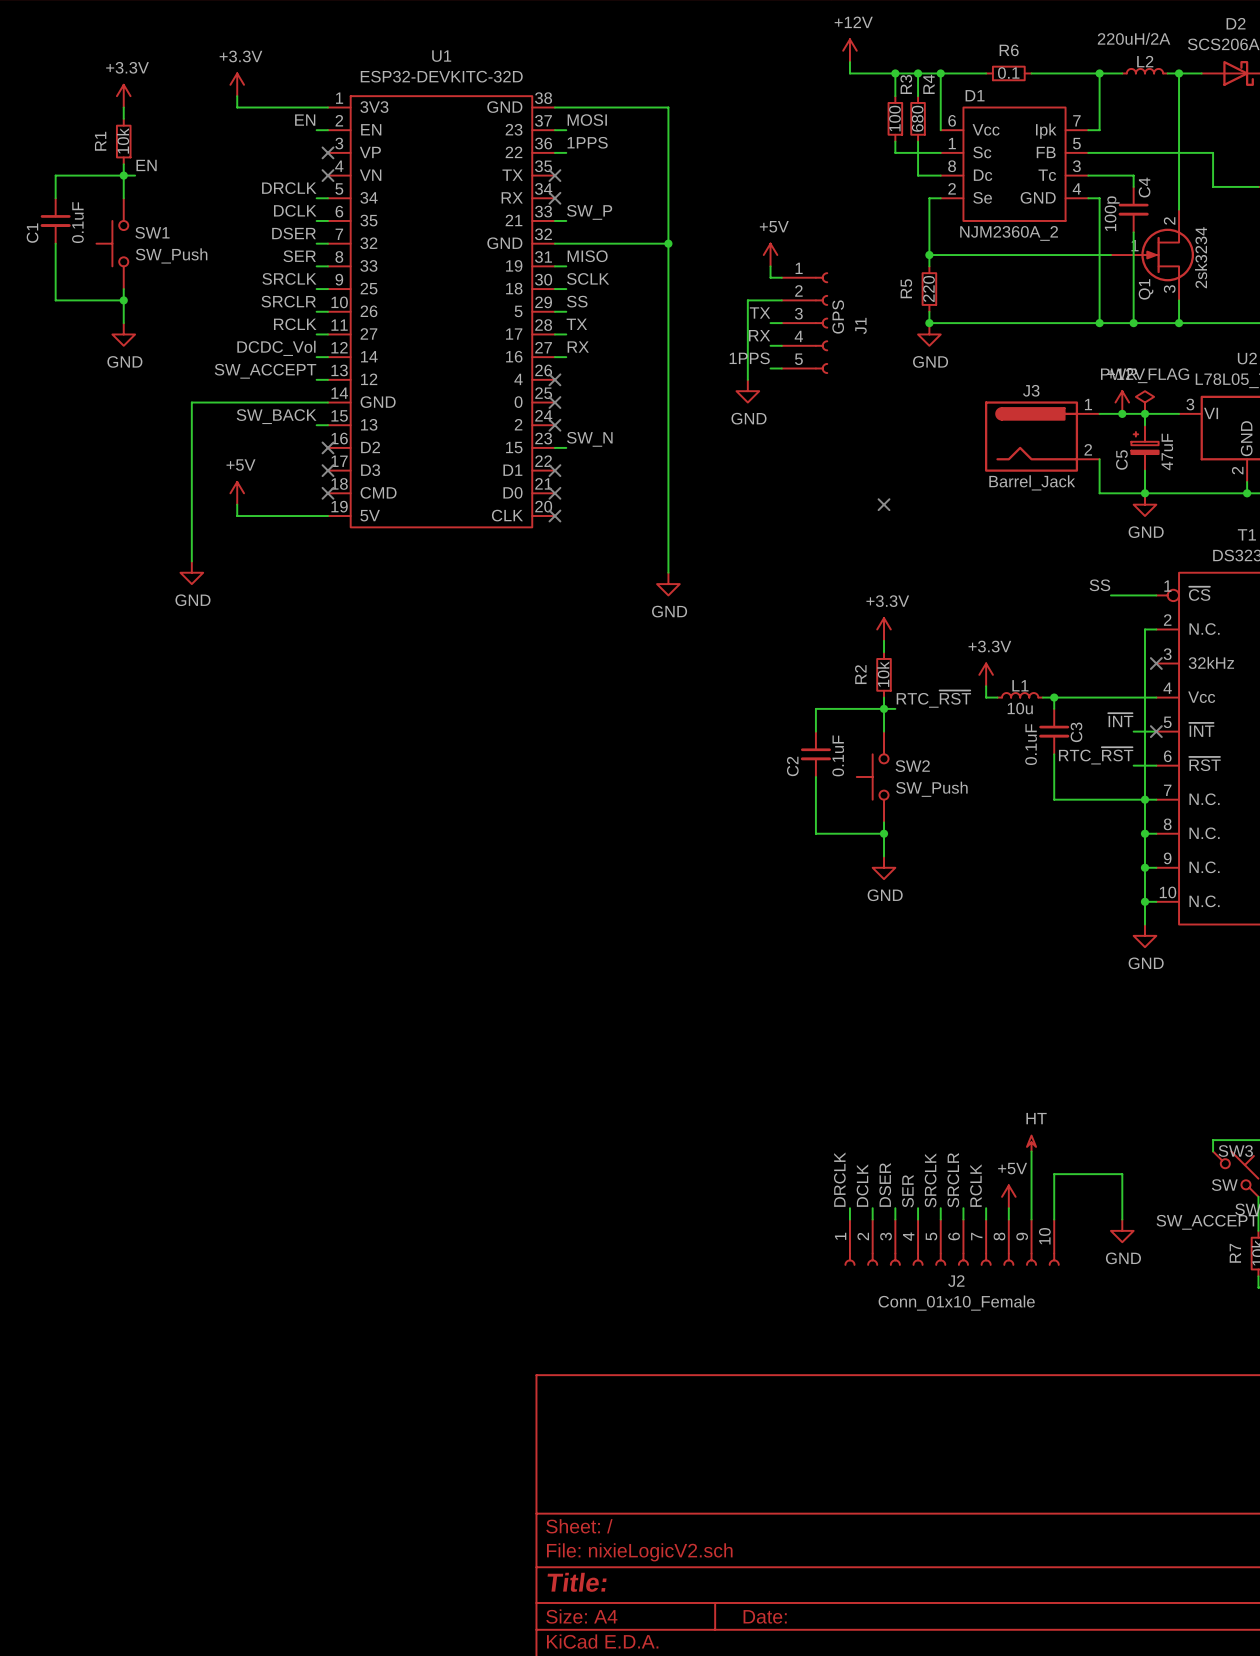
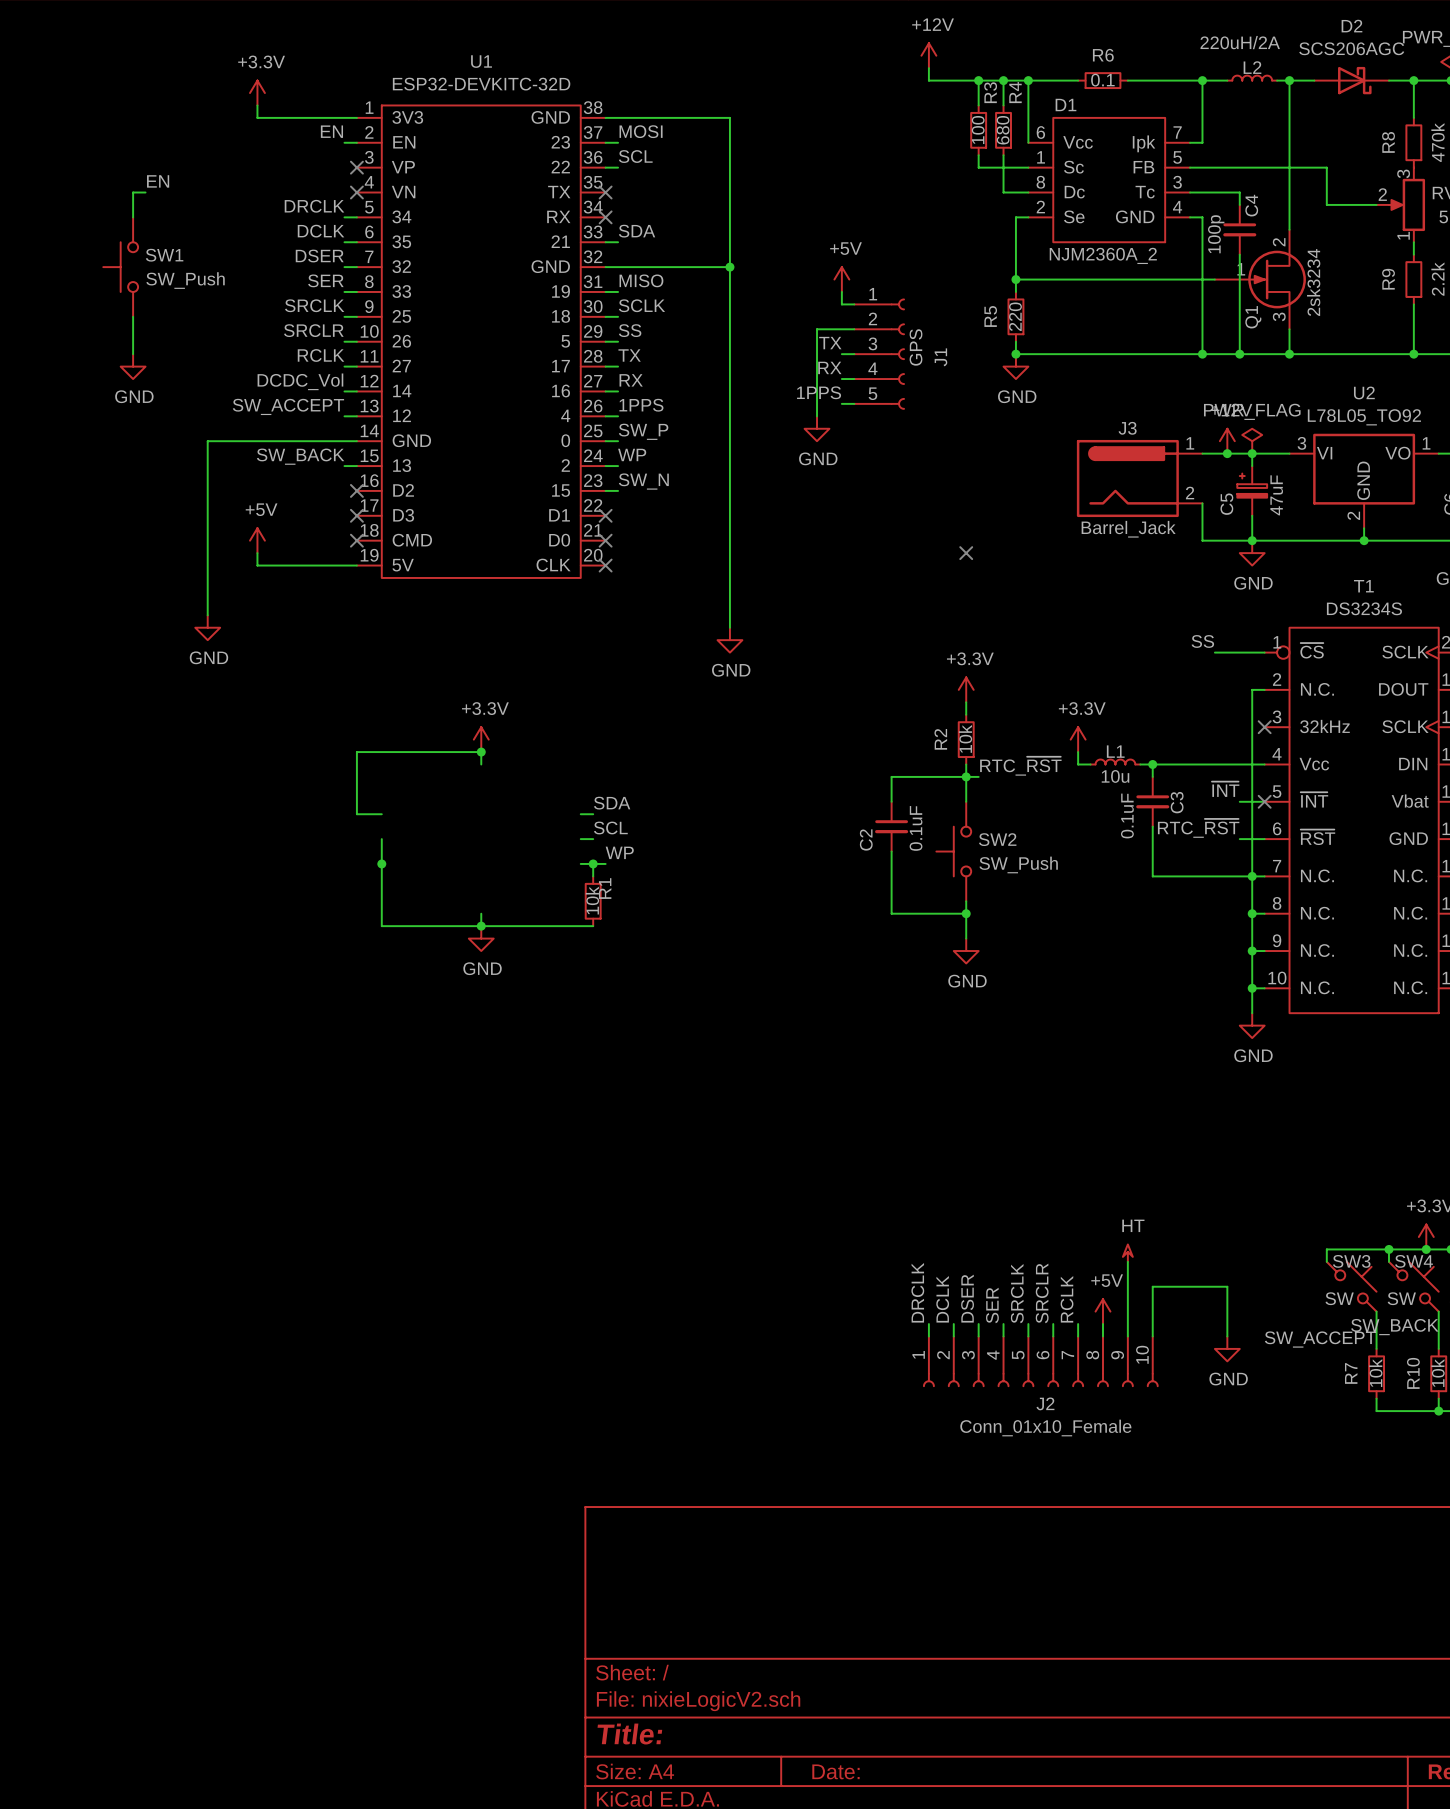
power symbol: +3.3V (123, 96) -> none
wire: (123, 107) (123, 118) -> none
R1 name position: R1 (100, 141) -> R1 (605, 888)
R1 position: (123, 141) -> (593, 901)
label: 1PPS (587, 142) -> SCL (635, 156)
wire: (123, 164) (123, 175) (55, 175) (55, 198) -> none
junction: (123, 175) -> none
label: SW_P (589, 212) -> SDA (637, 231)
C1: 0.1uF (55, 220) -> none
wire: (55, 243) (55, 300) (123, 300) -> none
junction: (123, 300) -> none
label: none -> 1PPS (641, 405)
wire: none -> (605, 416) (618, 416)
no-connect mark: (554, 379) -> none
label: none -> SW_P (643, 431)
wire: none -> (605, 441) (618, 441)
no-connect mark: (554, 402) -> none
label: none -> WP (632, 454)
wire: none -> (605, 466) (618, 466)
no-connect mark: (554, 425) -> none
power symbol: none -> +3.3V (481, 739)
junction: none -> (481, 752)
wire: none -> (481, 764) (481, 752) (356, 752) (356, 814) (381, 814)
label: none -> SDA (612, 803)
wire: none -> (580, 814) (593, 814)
label: none -> SCL (610, 828)
wire: none -> (381, 839) (381, 926) (593, 926)
wire: none -> (580, 839) (593, 839)
label: none -> WP (619, 852)
junction: none -> (381, 863)
wire: none -> (580, 863) (605, 863)
wire: none -> (593, 863) (593, 876)
junction: none -> (593, 863)
wire: none -> (481, 913) (481, 926)
junction: none -> (481, 926)
power symbol: none -> GND (481, 938)

